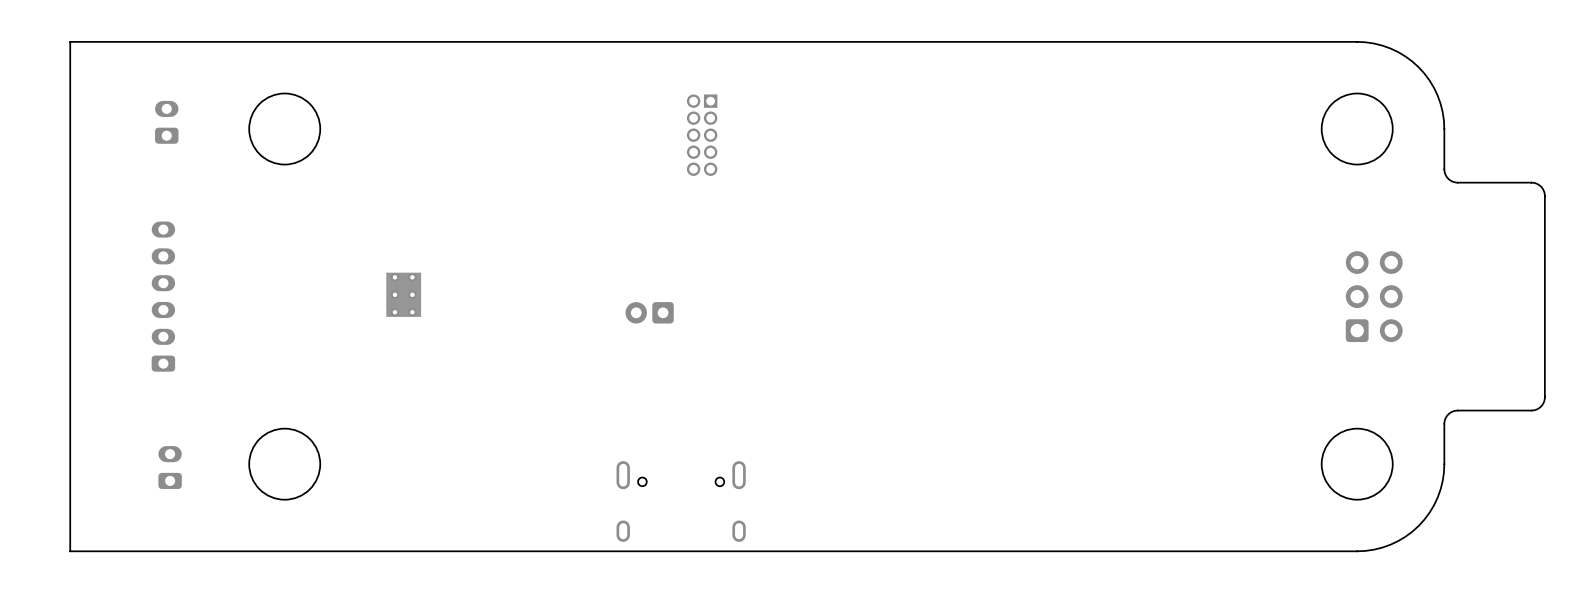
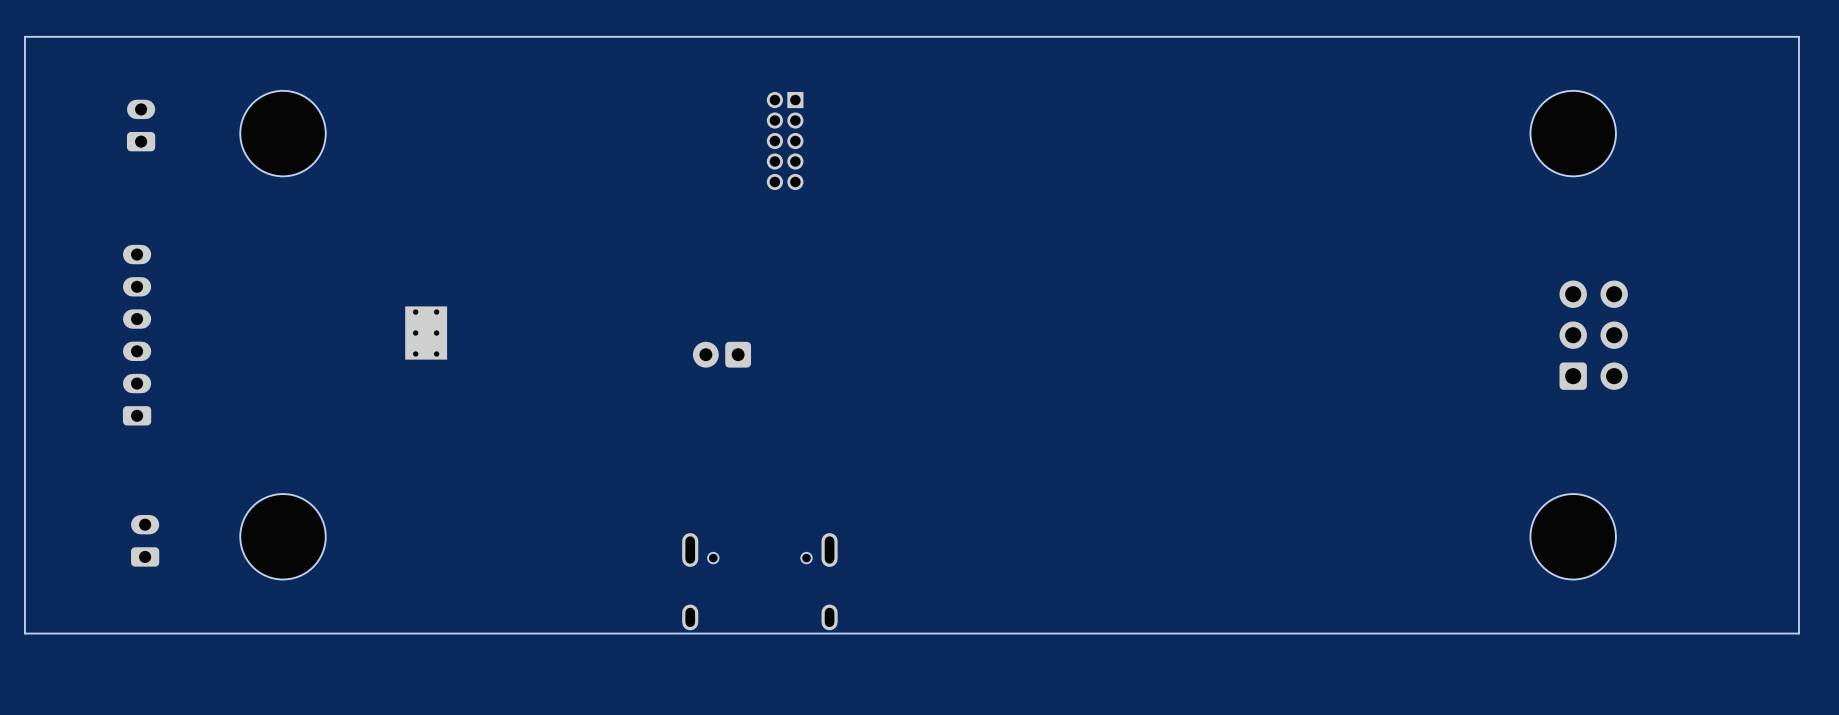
board edge: (70, 48) (70, 41) (1365, 42) (1390, 48) (1405, 56) (1418, 67) (1429, 80) (1437, 95) (1442, 112) (1444, 170) (1449, 179) (1457, 182) (1534, 182) (1541, 187) (1544, 196) -> (24, 36) (1798, 36) (1798, 214)
board edge: (1544, 397) (1541, 405) (1534, 410) (1457, 410) (1449, 413) (1444, 422) (1442, 481) (1437, 497) (1429, 512) (1418, 525) (1405, 536) (1382, 547) (1365, 550) (70, 551) (70, 544) -> (1798, 456) (1798, 633) (24, 633)

